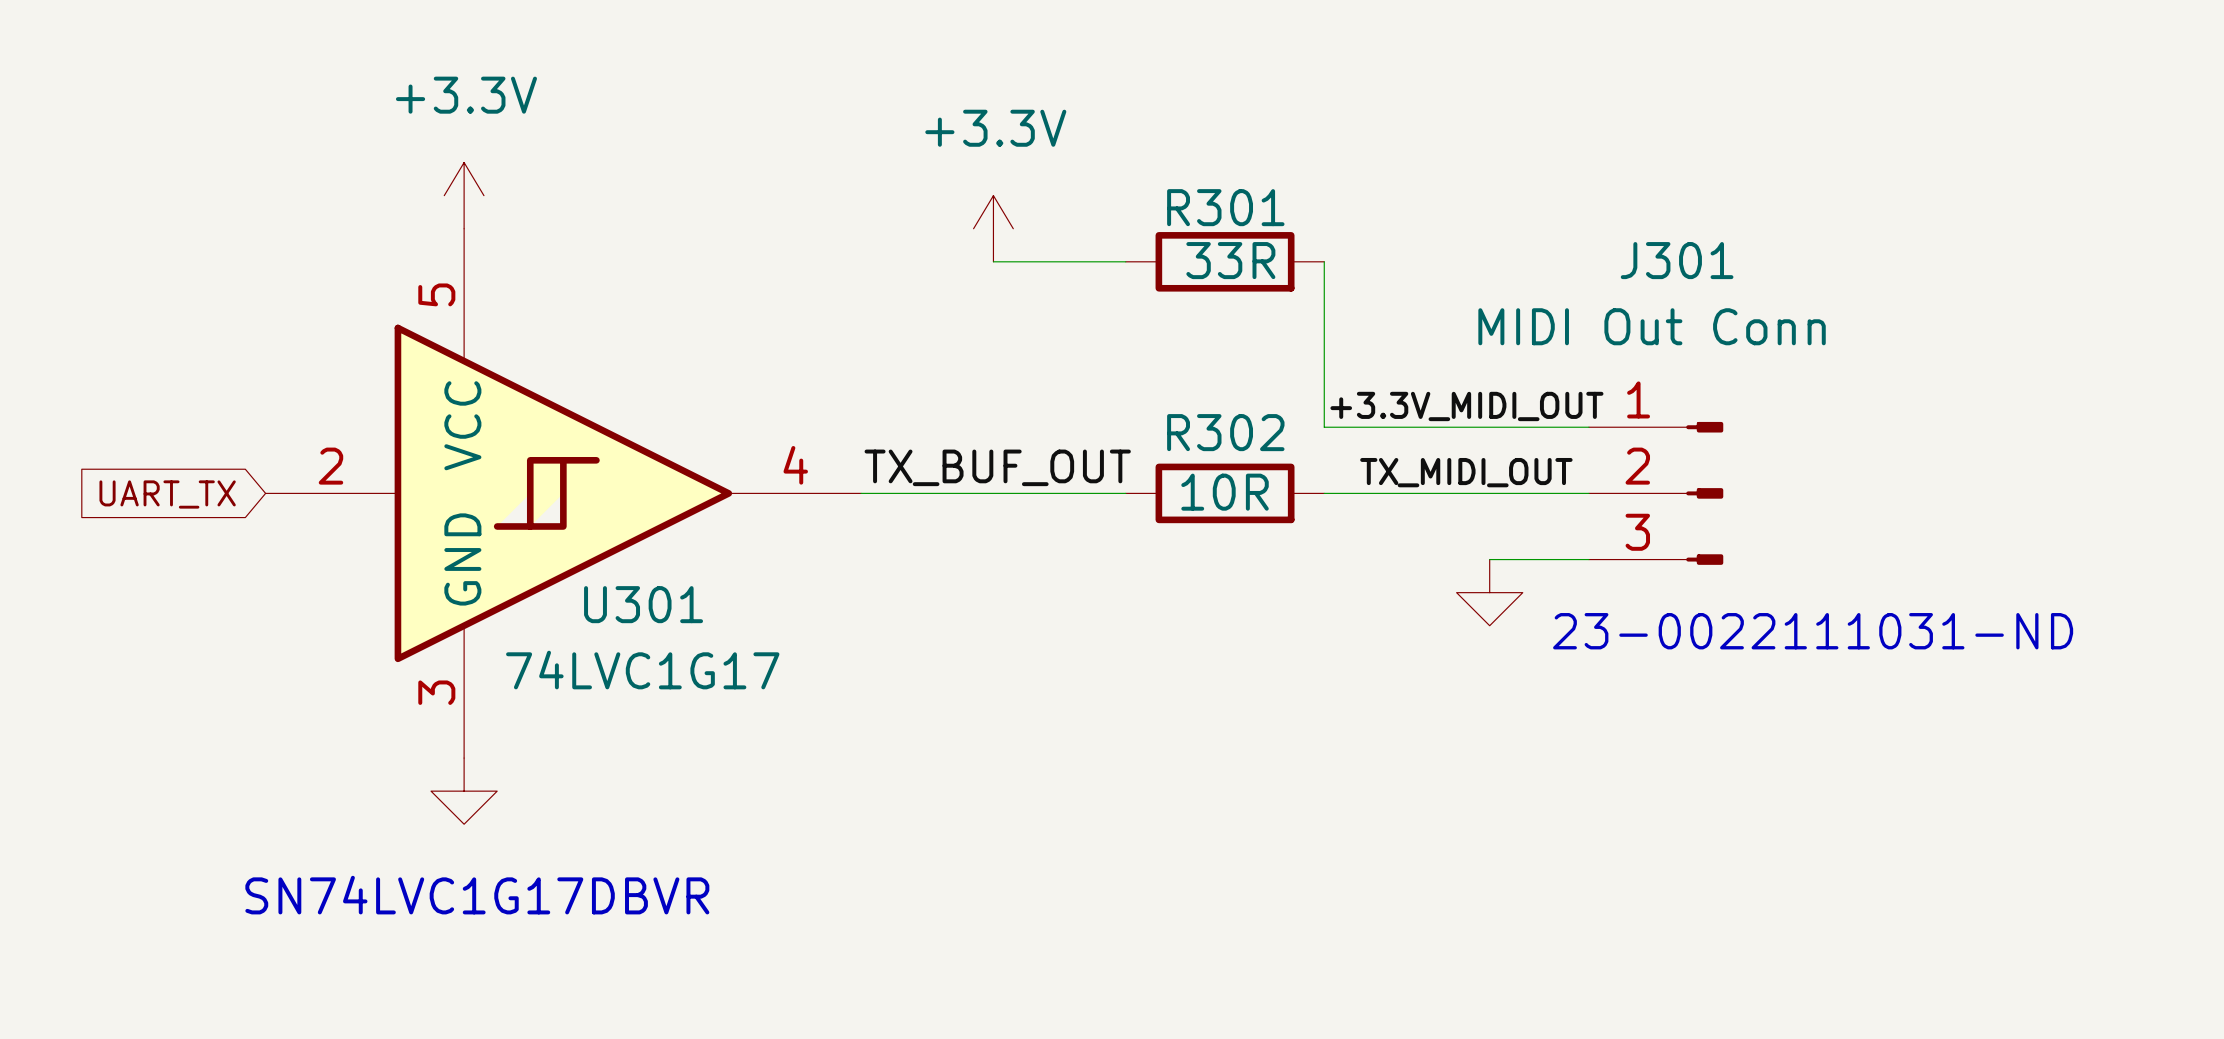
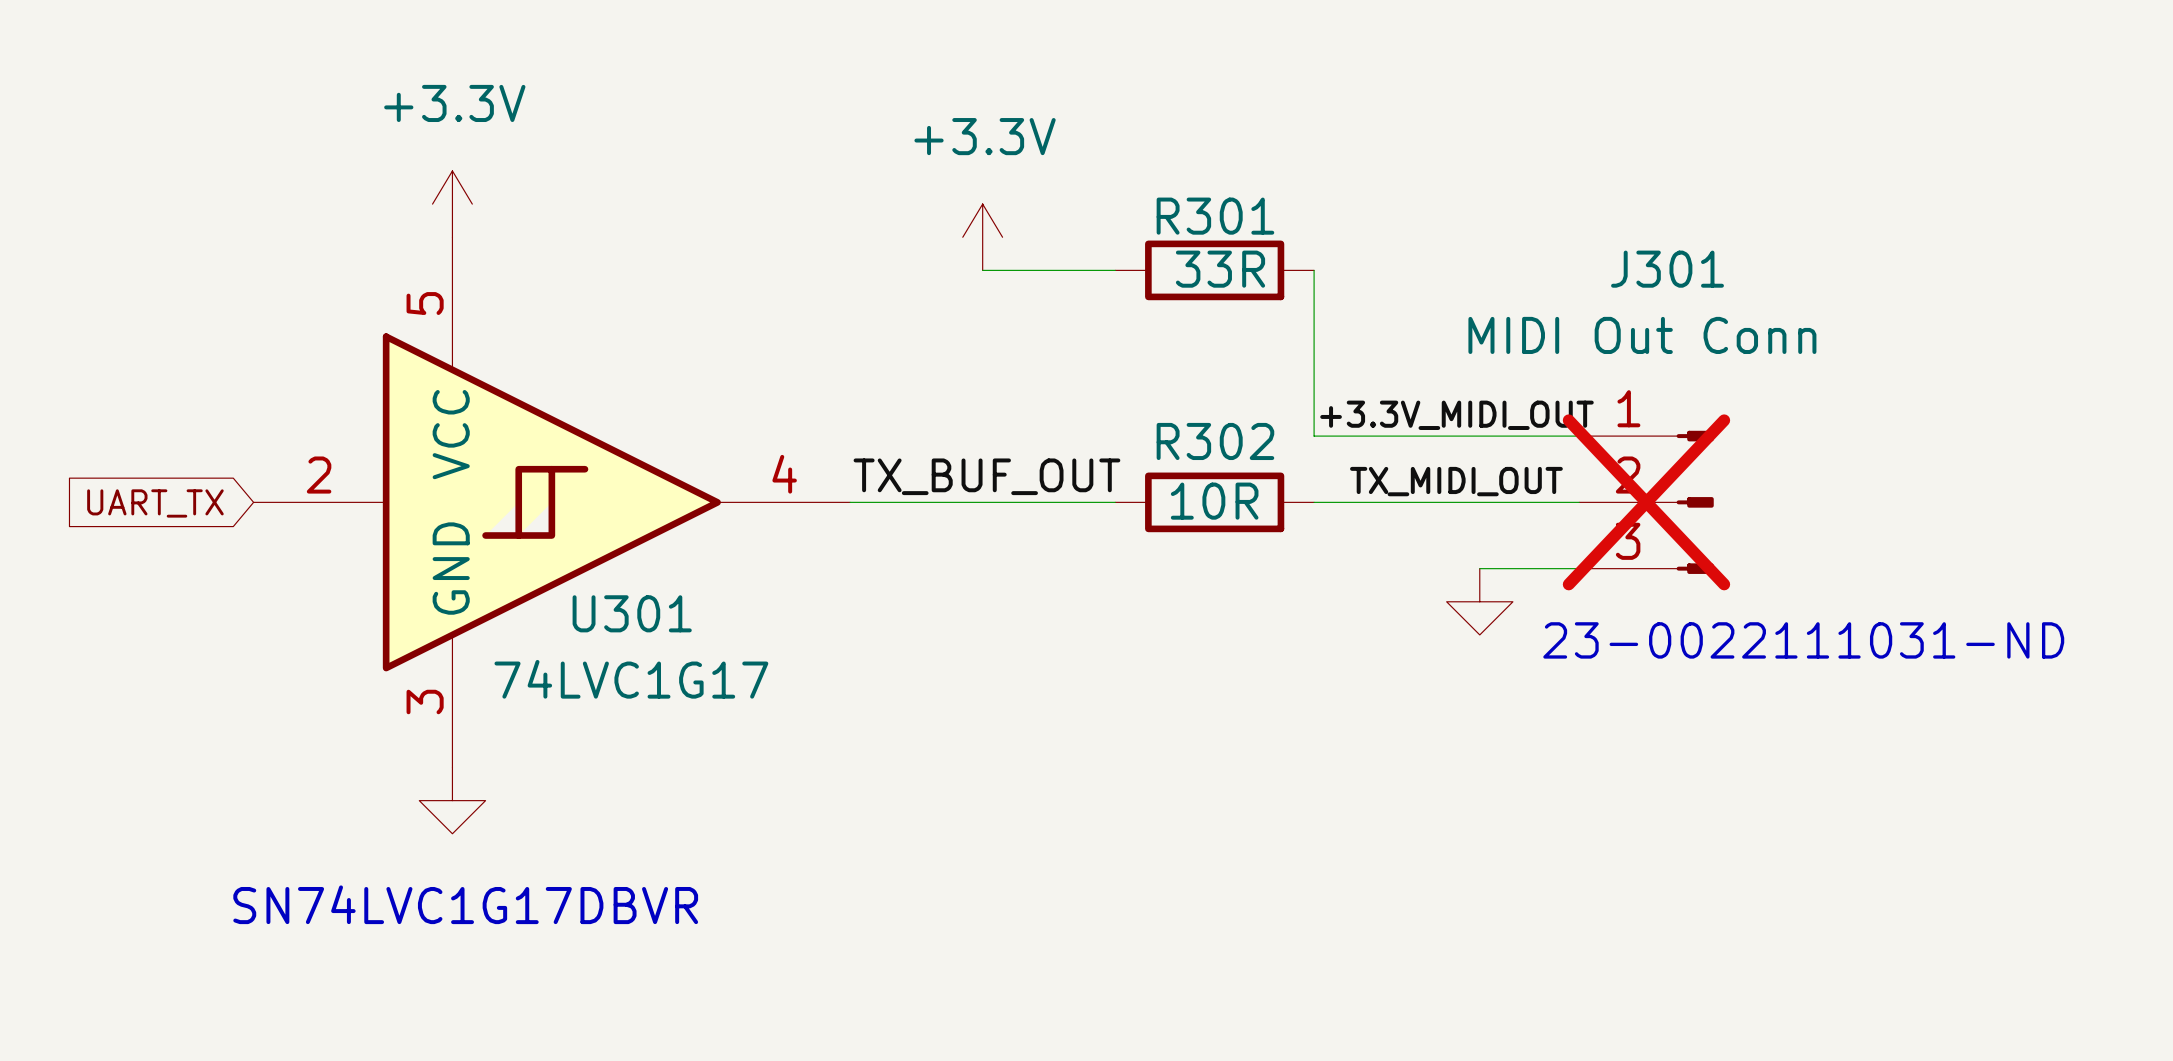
J301 do-not-place cross: none -> (1646, 502)

